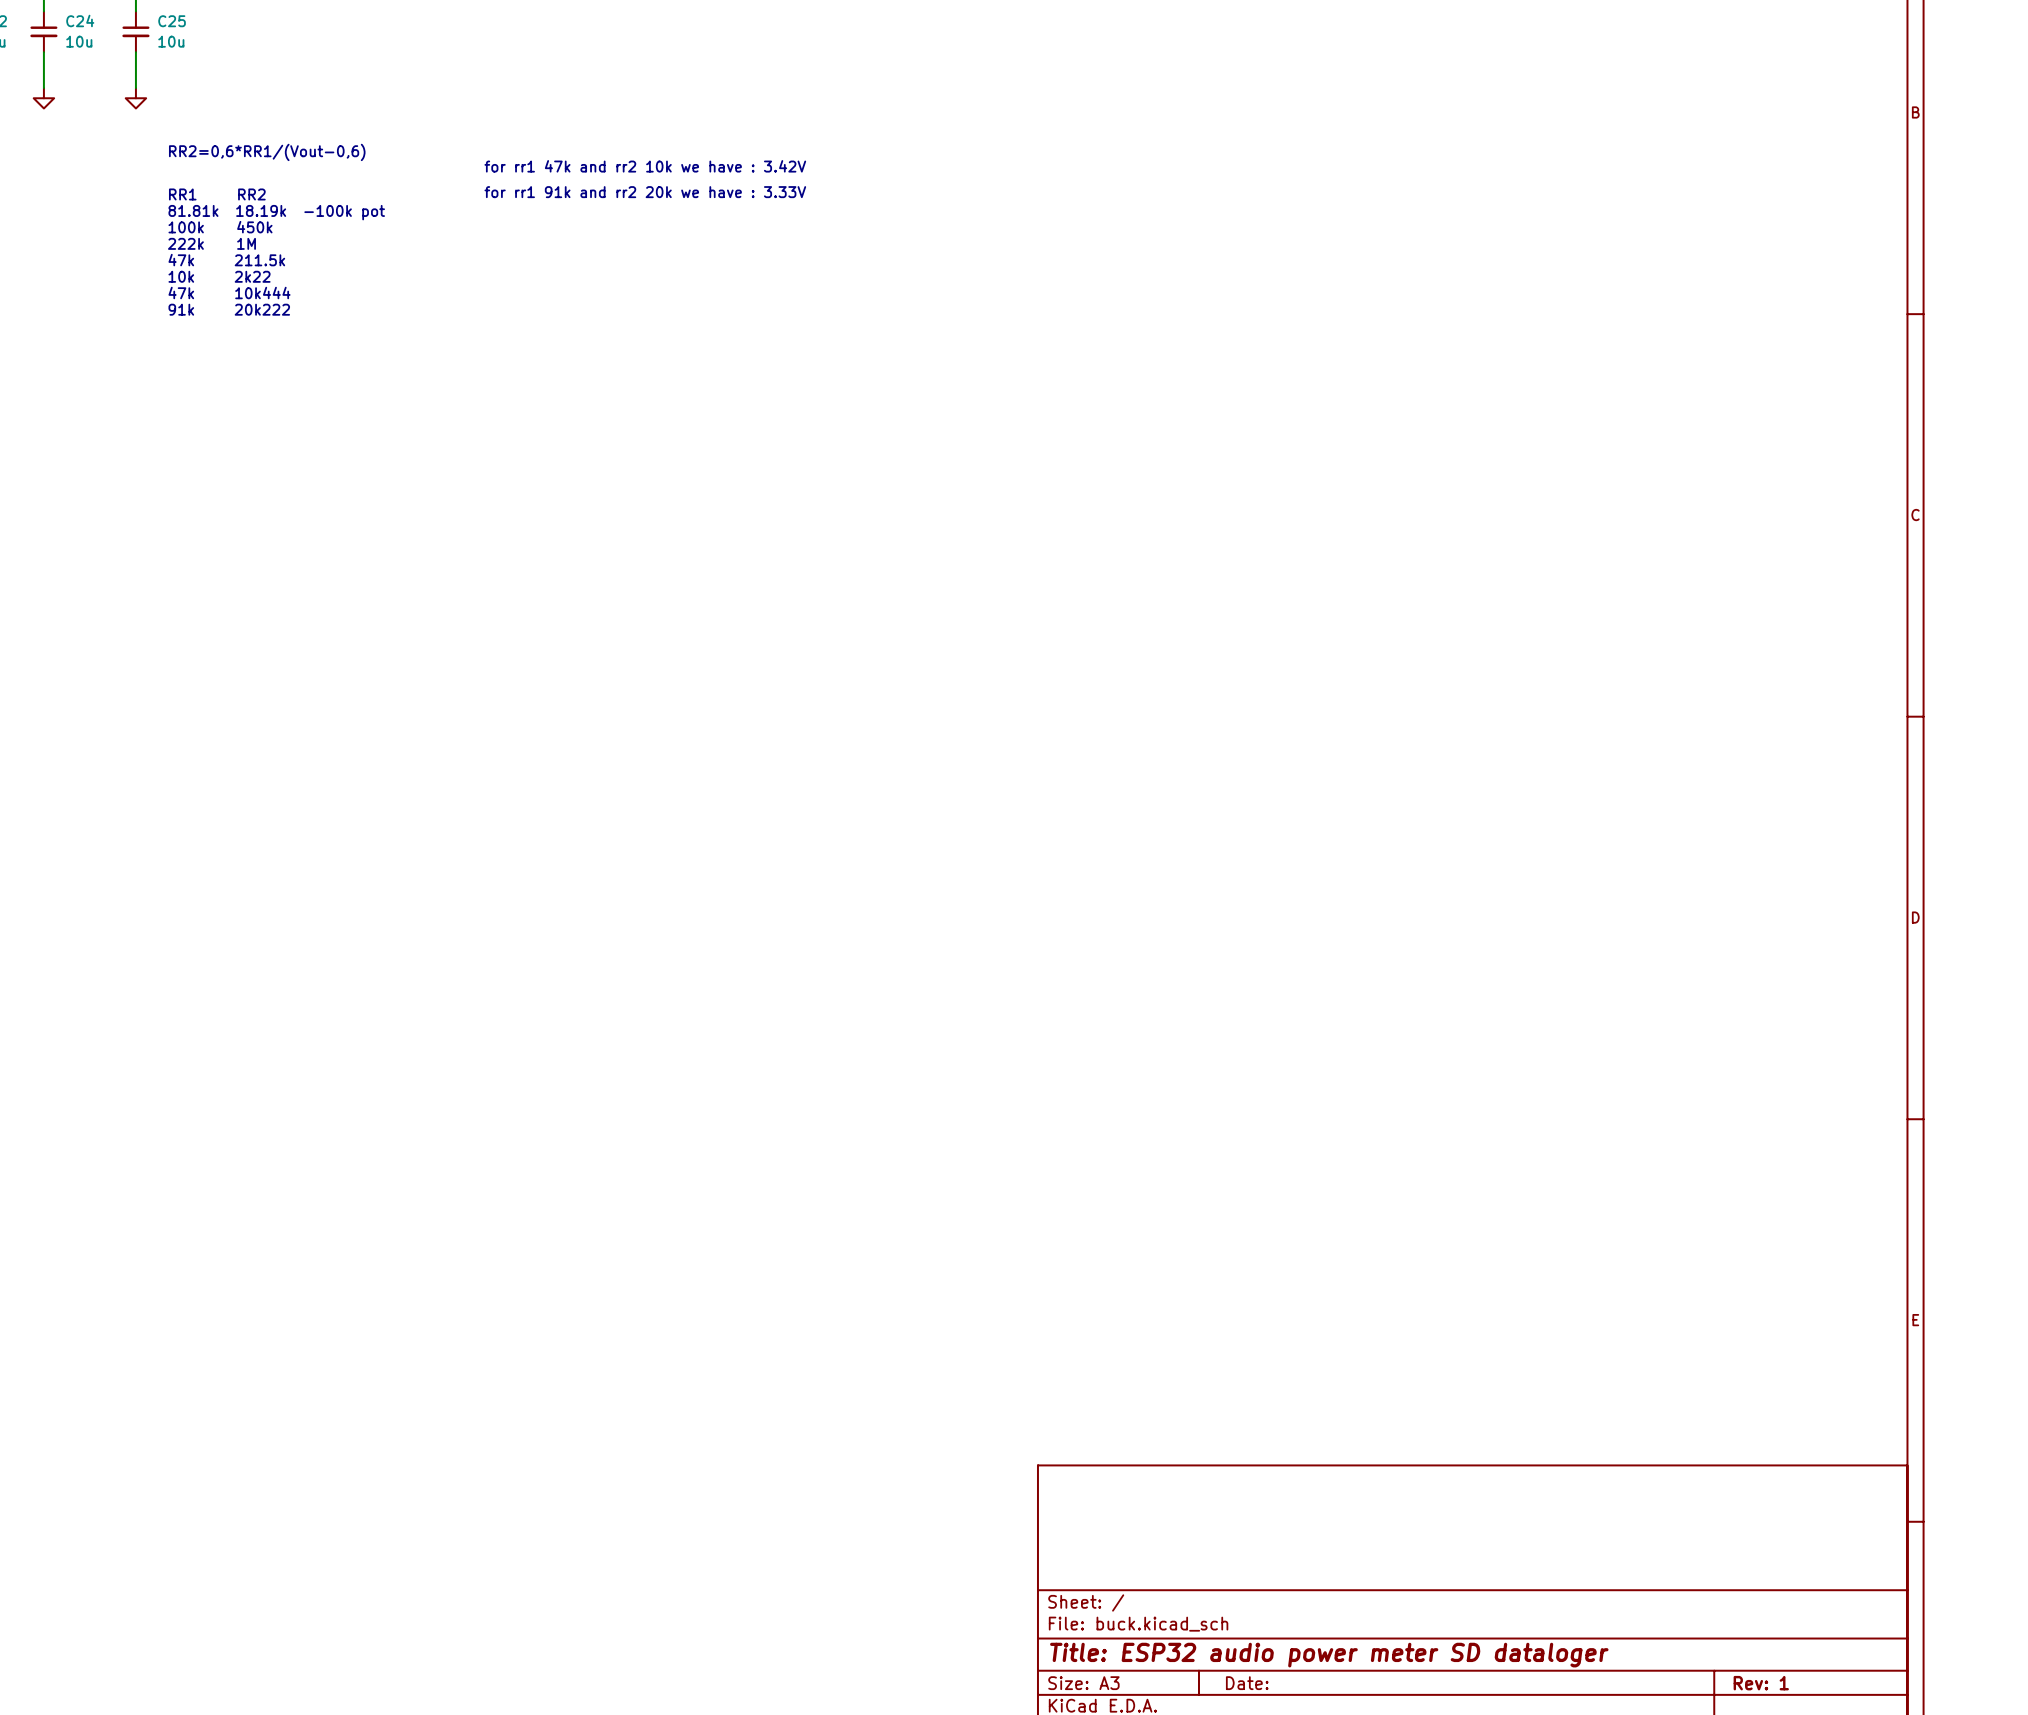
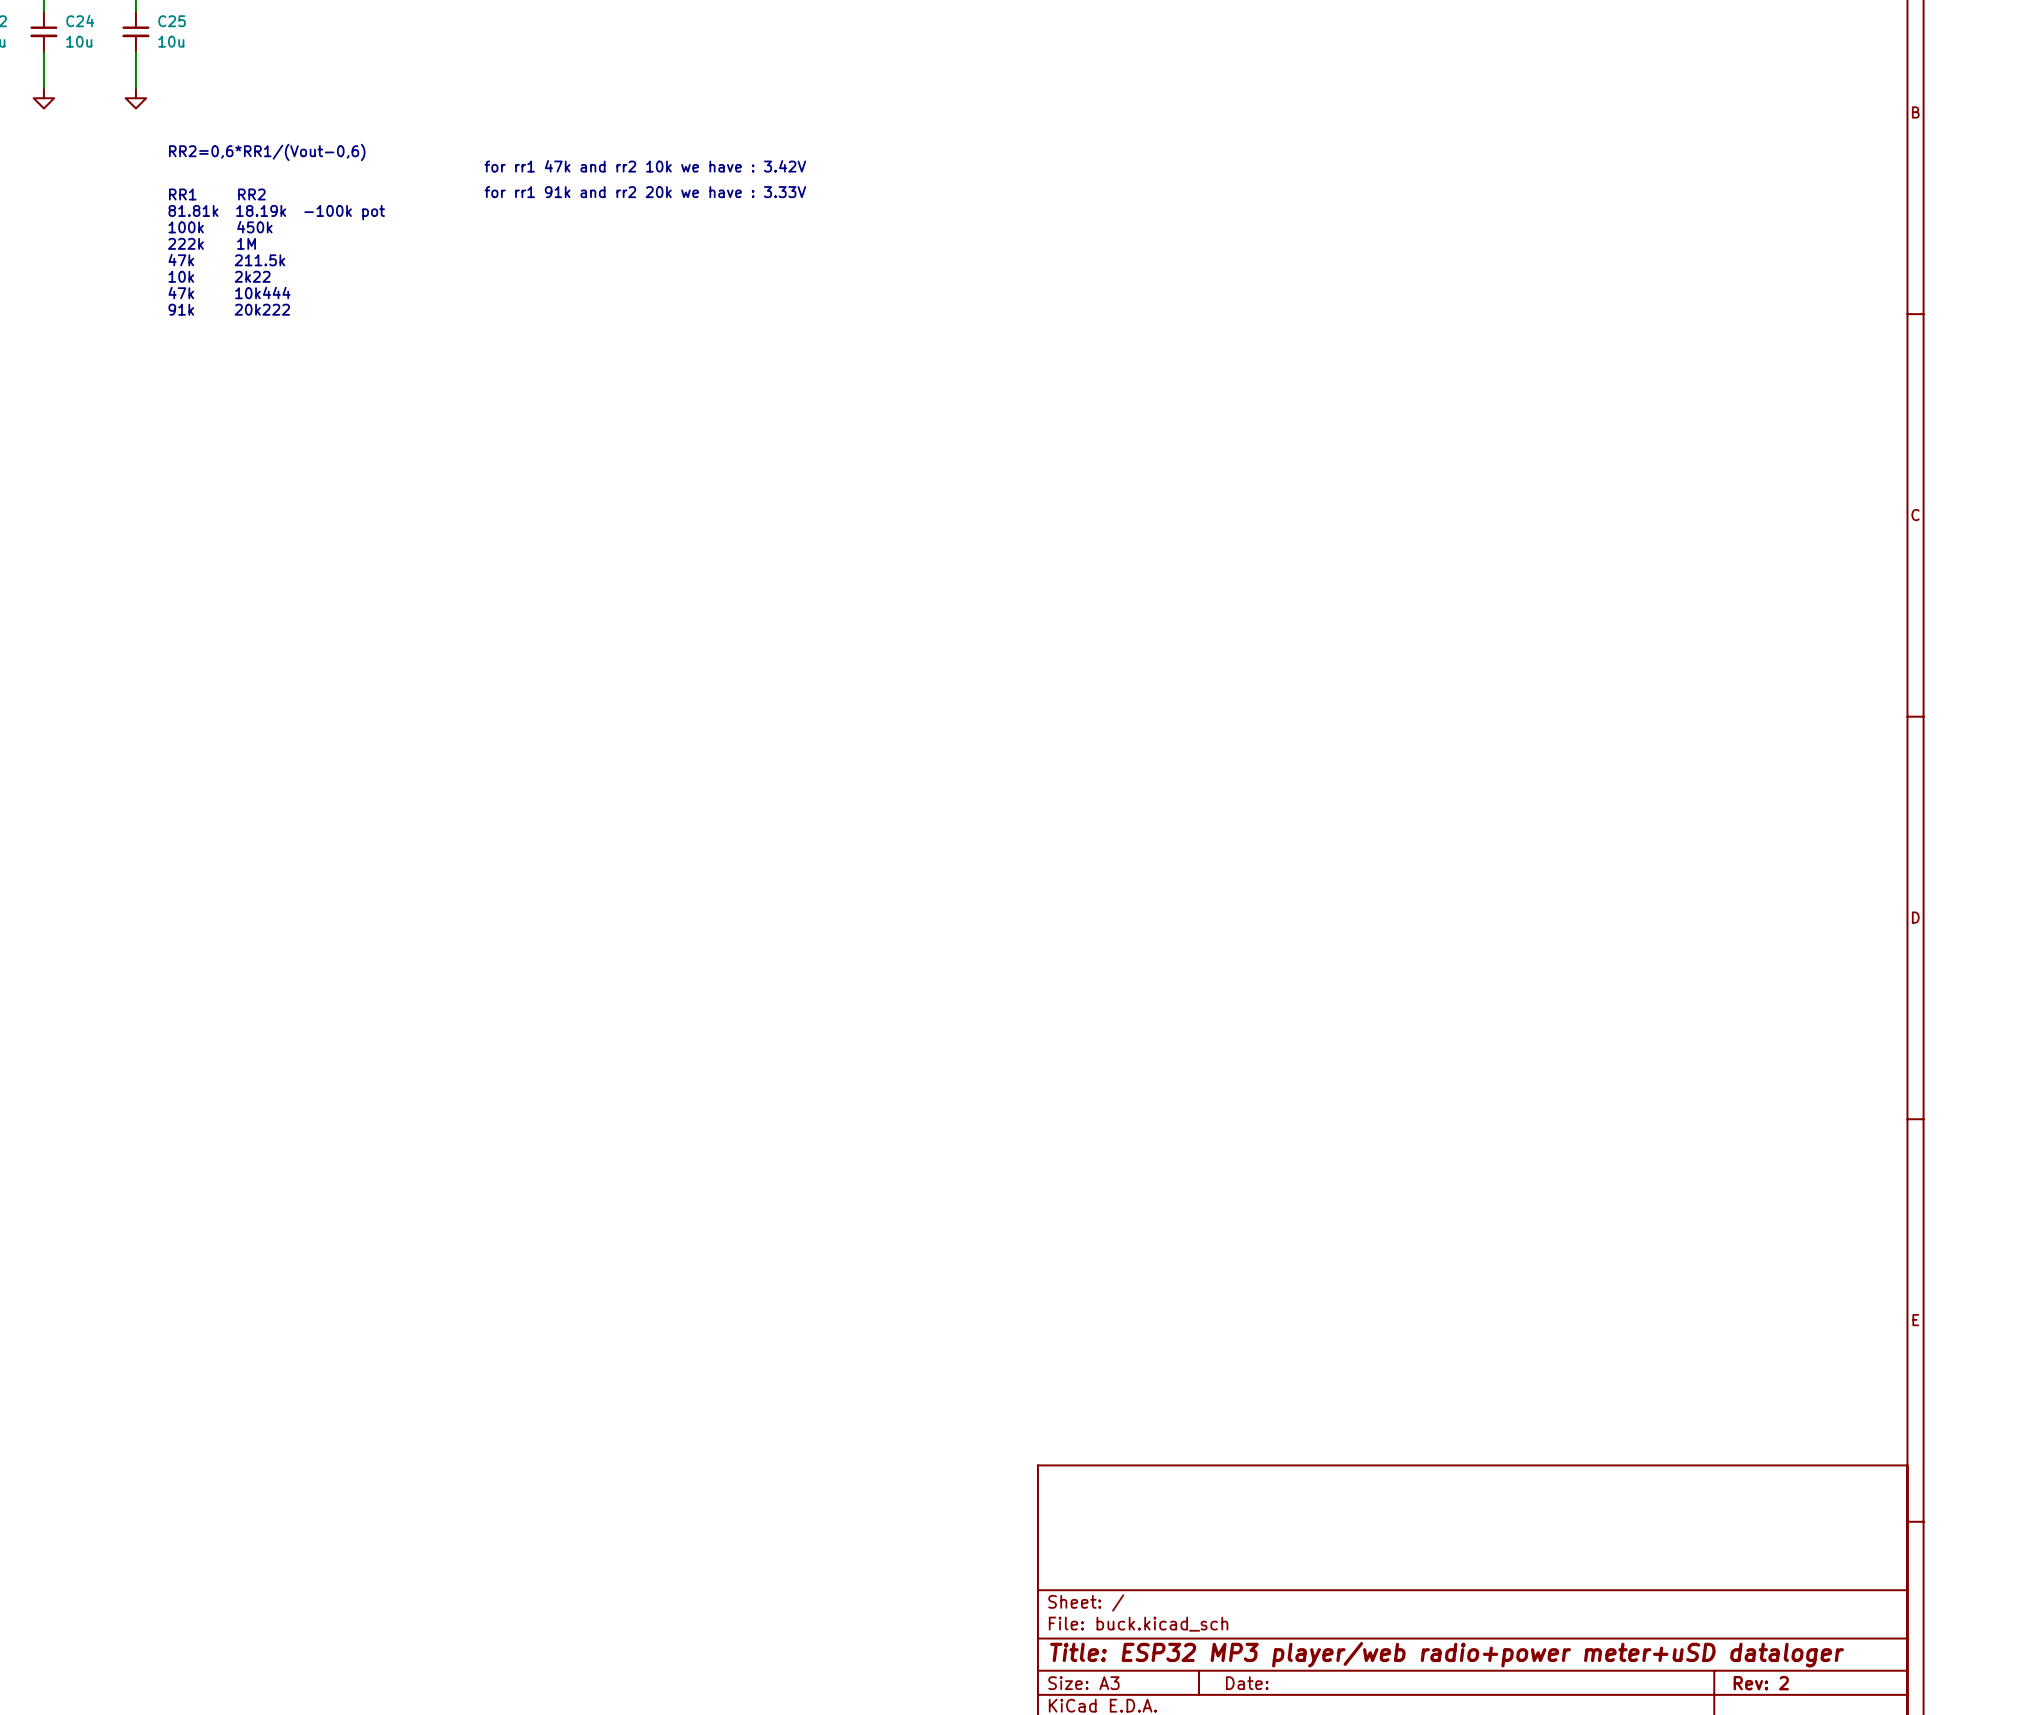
title block: Title: ESP32 audio power meter SD dataloger (1329, 1655) -> Title: ESP32 MP3 player/web radio+power meter+uSD dataloger (1447, 1654)
title block: Rev: 1 (1761, 1683) -> Rev: 2 (1761, 1683)

